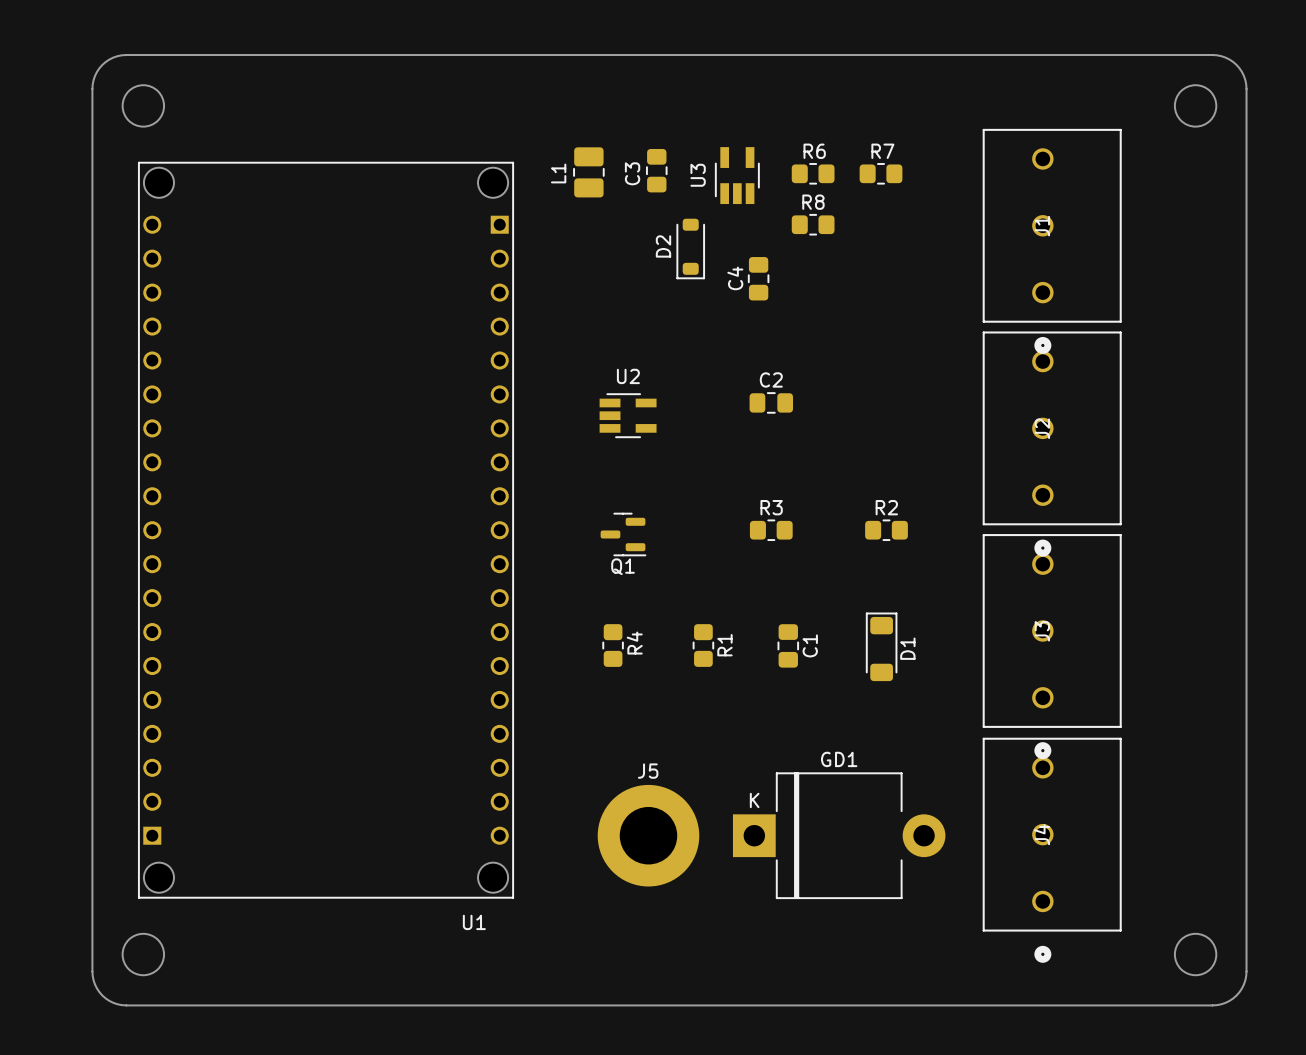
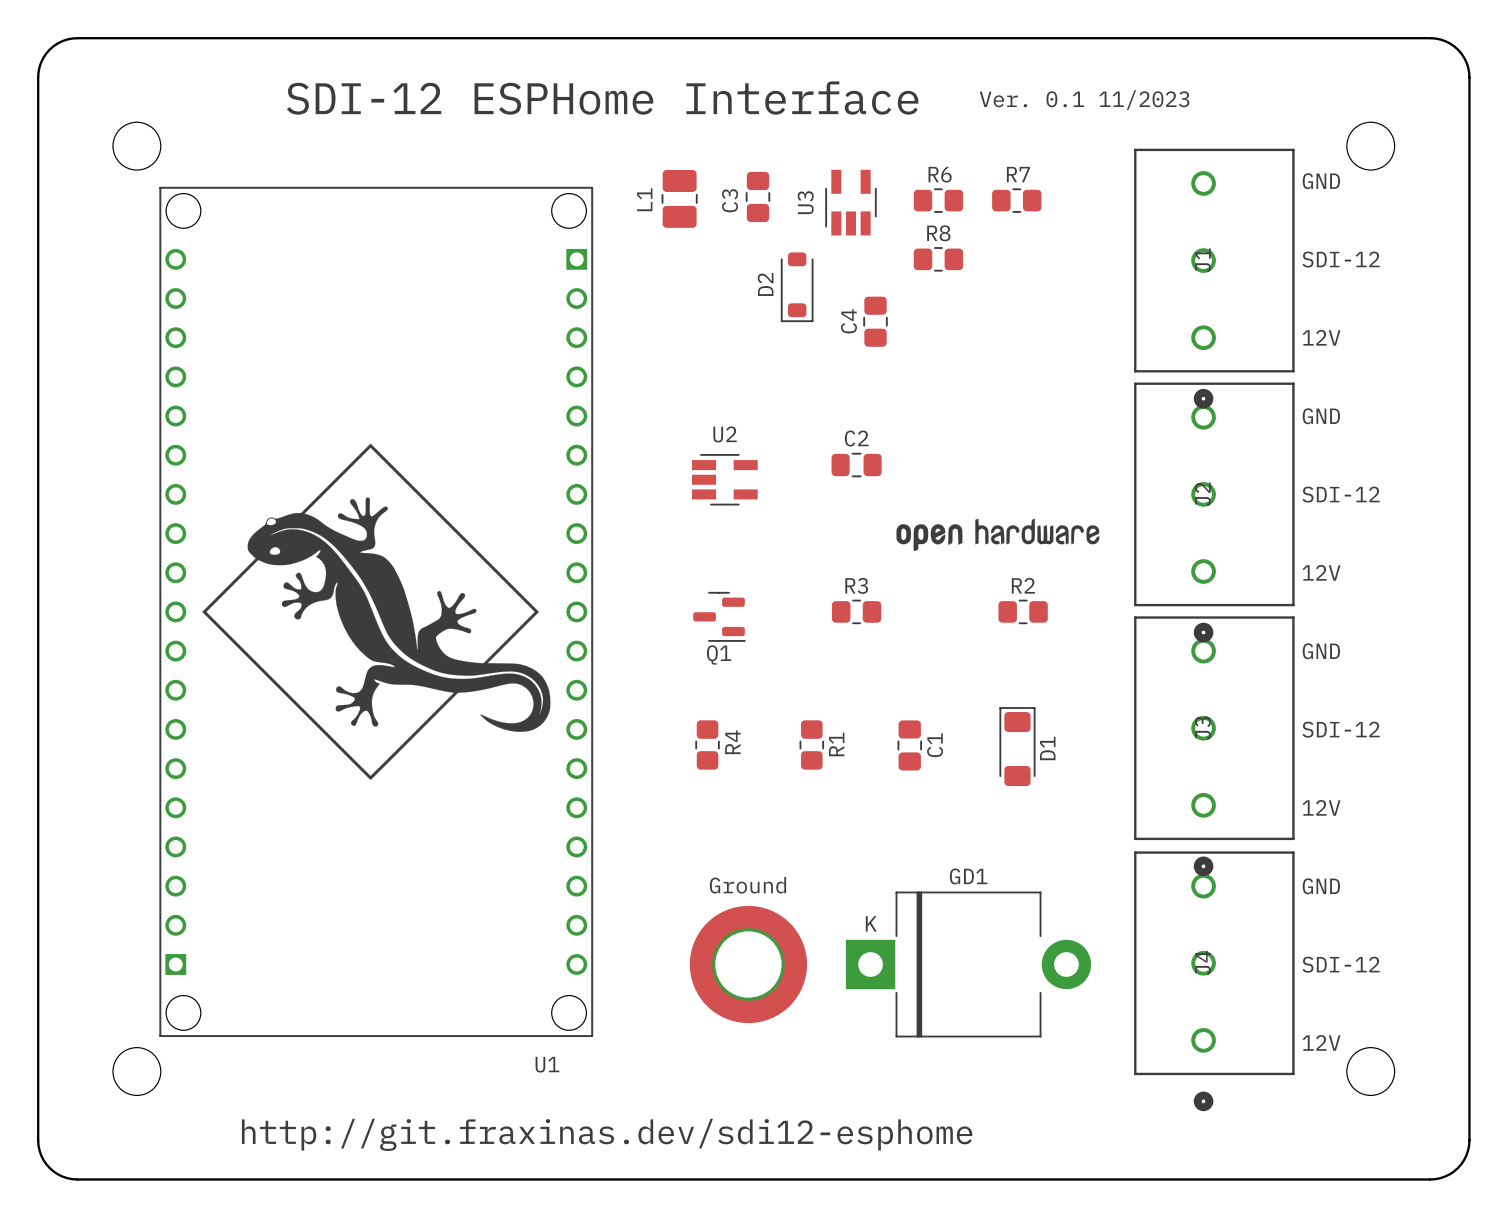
board edge: (126, 55) (1212, 55) (1225, 57) (1233, 62) (1243, 75) (1246, 88) (1246, 971) (1243, 984) (1239, 992) (1225, 1002) (1212, 1005) (126, 1005) (117, 1004) (105, 998) (96, 988) (92, 971) (92, 88) (95, 75) (102, 64) (113, 57) (126, 55) -> (77, 38) (62, 41) (49, 49) (41, 62) (38, 77) (38, 1140) (41, 1155) (53, 1171) (67, 1178) (77, 1179) (1430, 1179) (1445, 1176) (1461, 1164) (1468, 1150) (1469, 1140) (1469, 77) (1466, 62) (1454, 46) (1440, 39) (1430, 38) (77, 38)
text: none -> SDI-12 ESPHome Interface (602, 98)
text: none -> Ver. 0.1 11/2023 (1084, 100)
round board edge position: (143, 105) -> (136, 146)
round board edge position: (1195, 105) -> (1370, 146)
text: none -> GND (1321, 181)
text: none -> SDI-12 (1341, 259)
text: none -> 12V (1321, 337)
text: none -> GND (1321, 416)
drawing: none -> [202, 443, 551, 781]
C2 position: (771, 402) -> (856, 465)
text: none -> SDI-12 (1341, 494)
drawing: none -> [896, 518, 1100, 552]
text: none -> 12V (1321, 572)
R3 position: (771, 530) -> (856, 611)
text: none -> GND (1321, 651)
text: none -> SDI-12 (1341, 729)
text: none -> 12V (1321, 807)
text: none -> GND (1321, 886)
J5 name: J5 (648, 771) -> Ground (747, 885)
text: none -> SDI-12 (1341, 964)
text: none -> 12V (1321, 1042)
round board edge position: (143, 954) -> (136, 1071)
round board edge position: (1195, 954) -> (1370, 1071)
text: none -> http://git.fraxinas.dev/sdi12-esphome (607, 1134)

